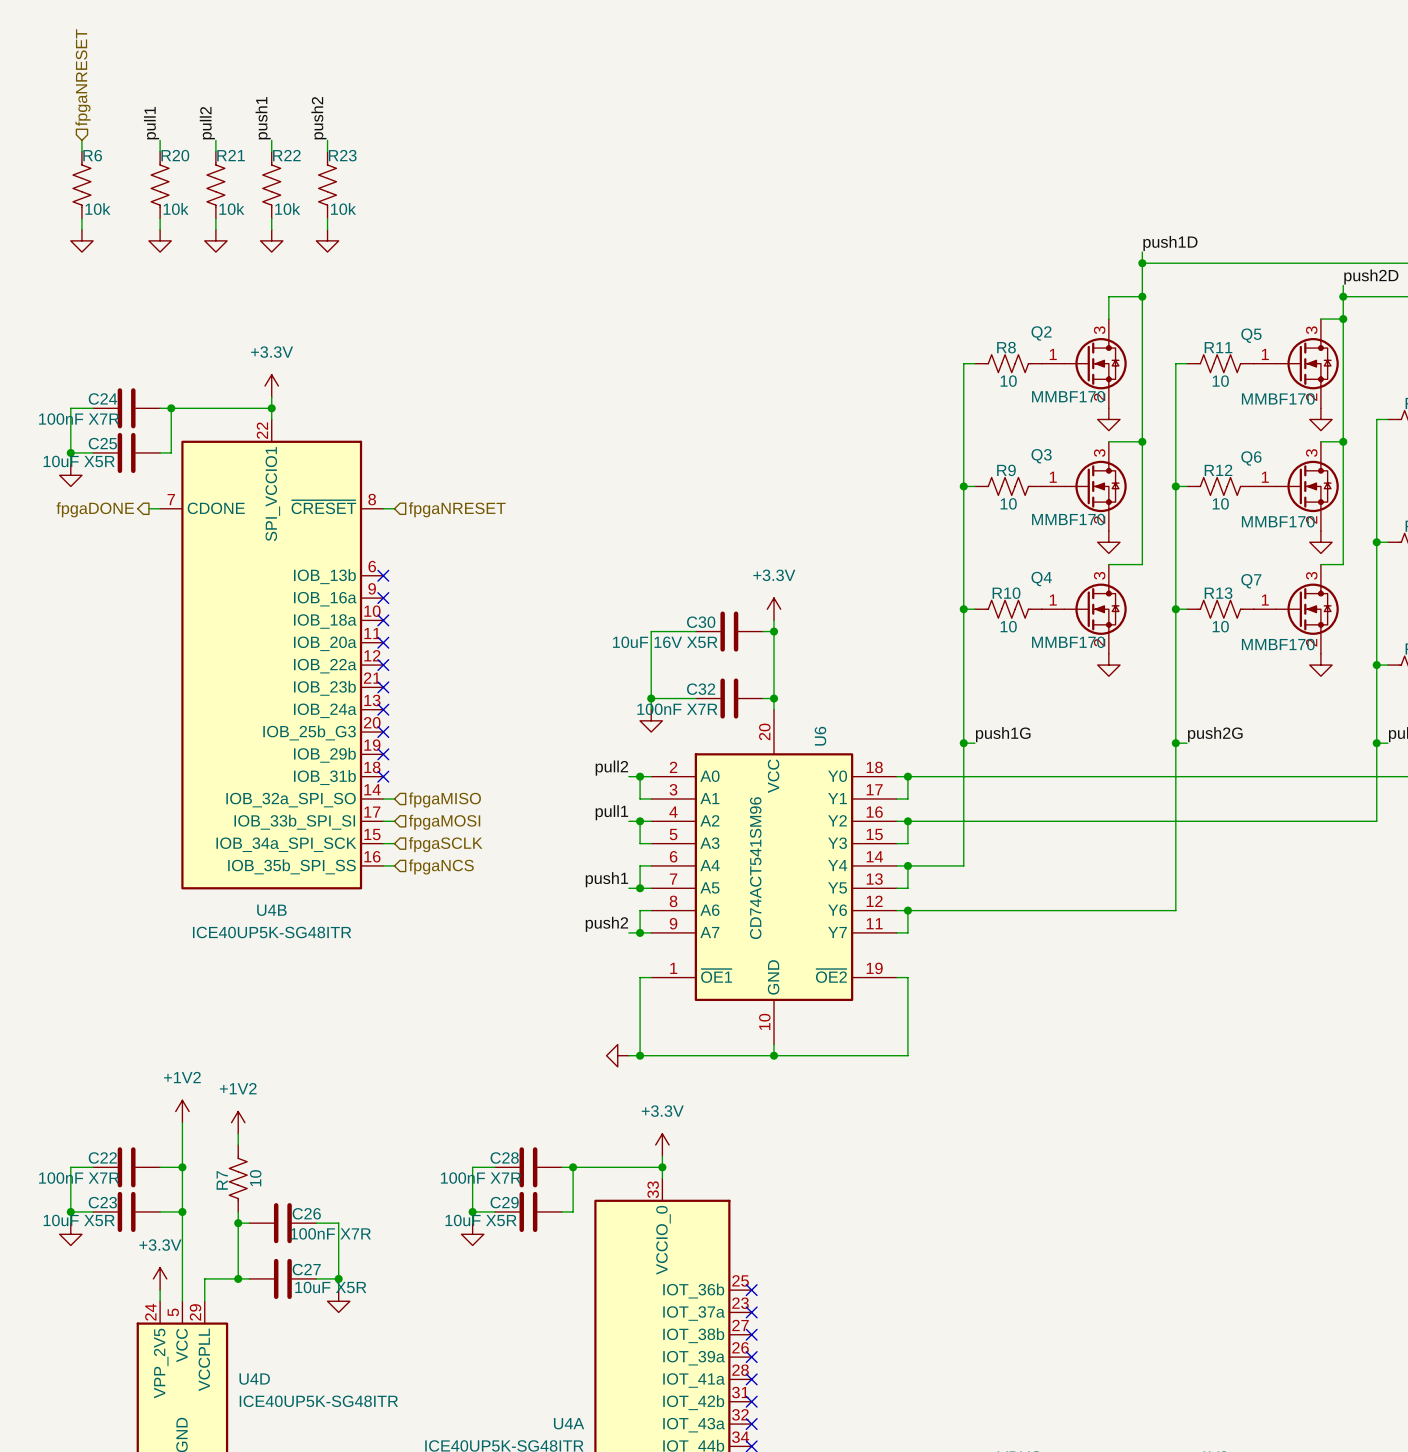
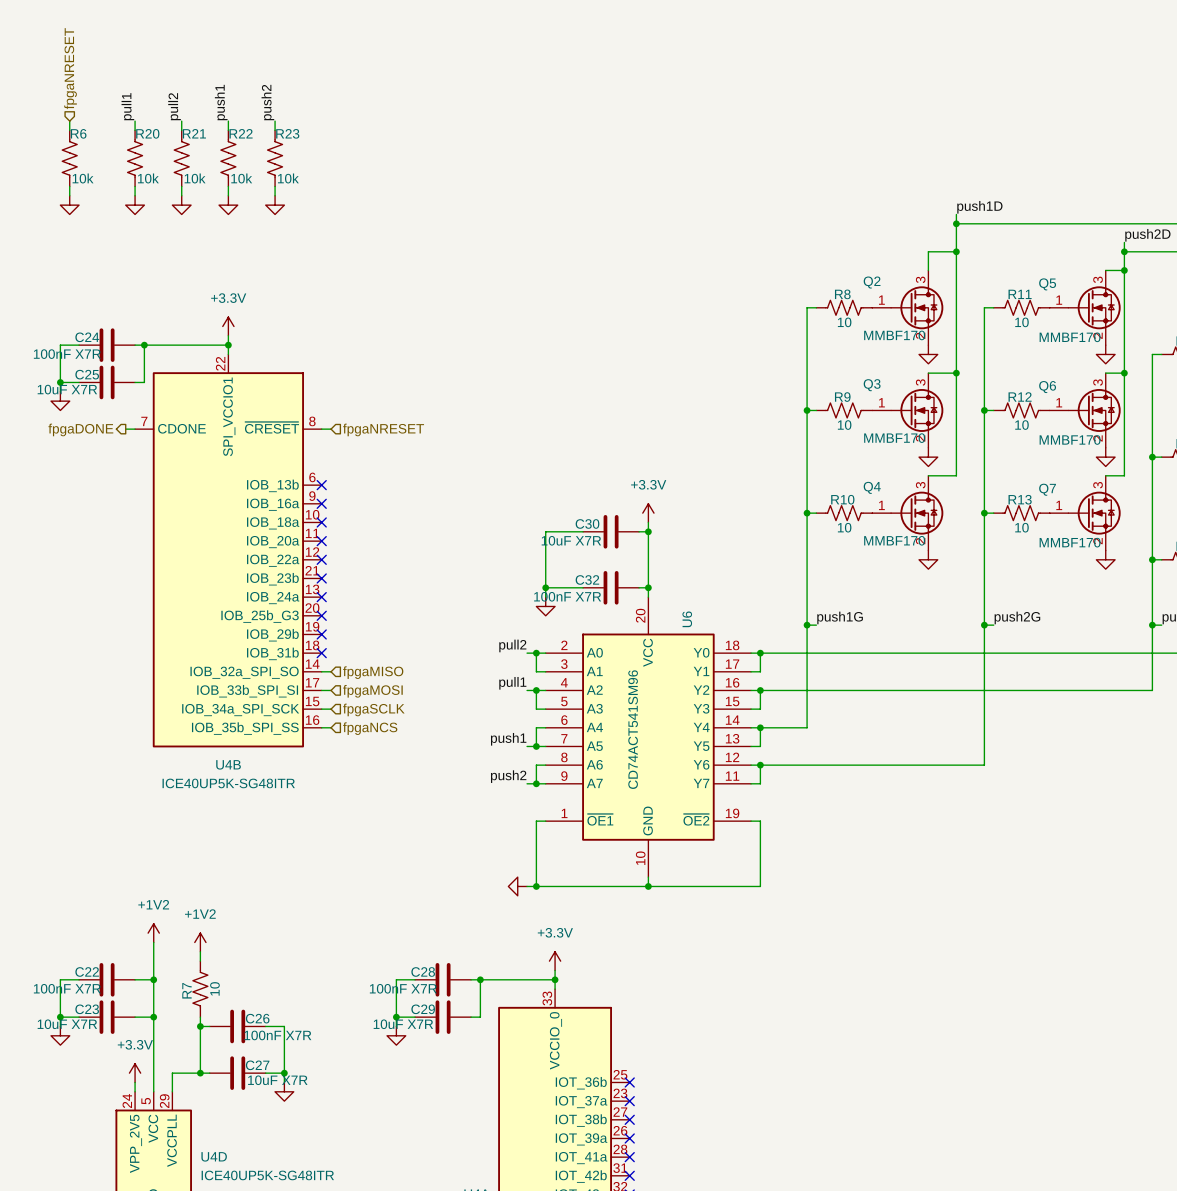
C25 value: 10uF X5R (79, 461) -> 10uF X7R (67, 389)
C30 value: 10uF 16V X5R (665, 642) -> 10uF X7R (571, 540)
C23 value: 10uF X5R (79, 1220) -> 10uF X7R (67, 1024)
C29 value: 10uF X5R (480, 1220) -> 10uF X7R (403, 1024)
C27 value: 10uF X5R (330, 1287) -> 10uF X7R (277, 1080)

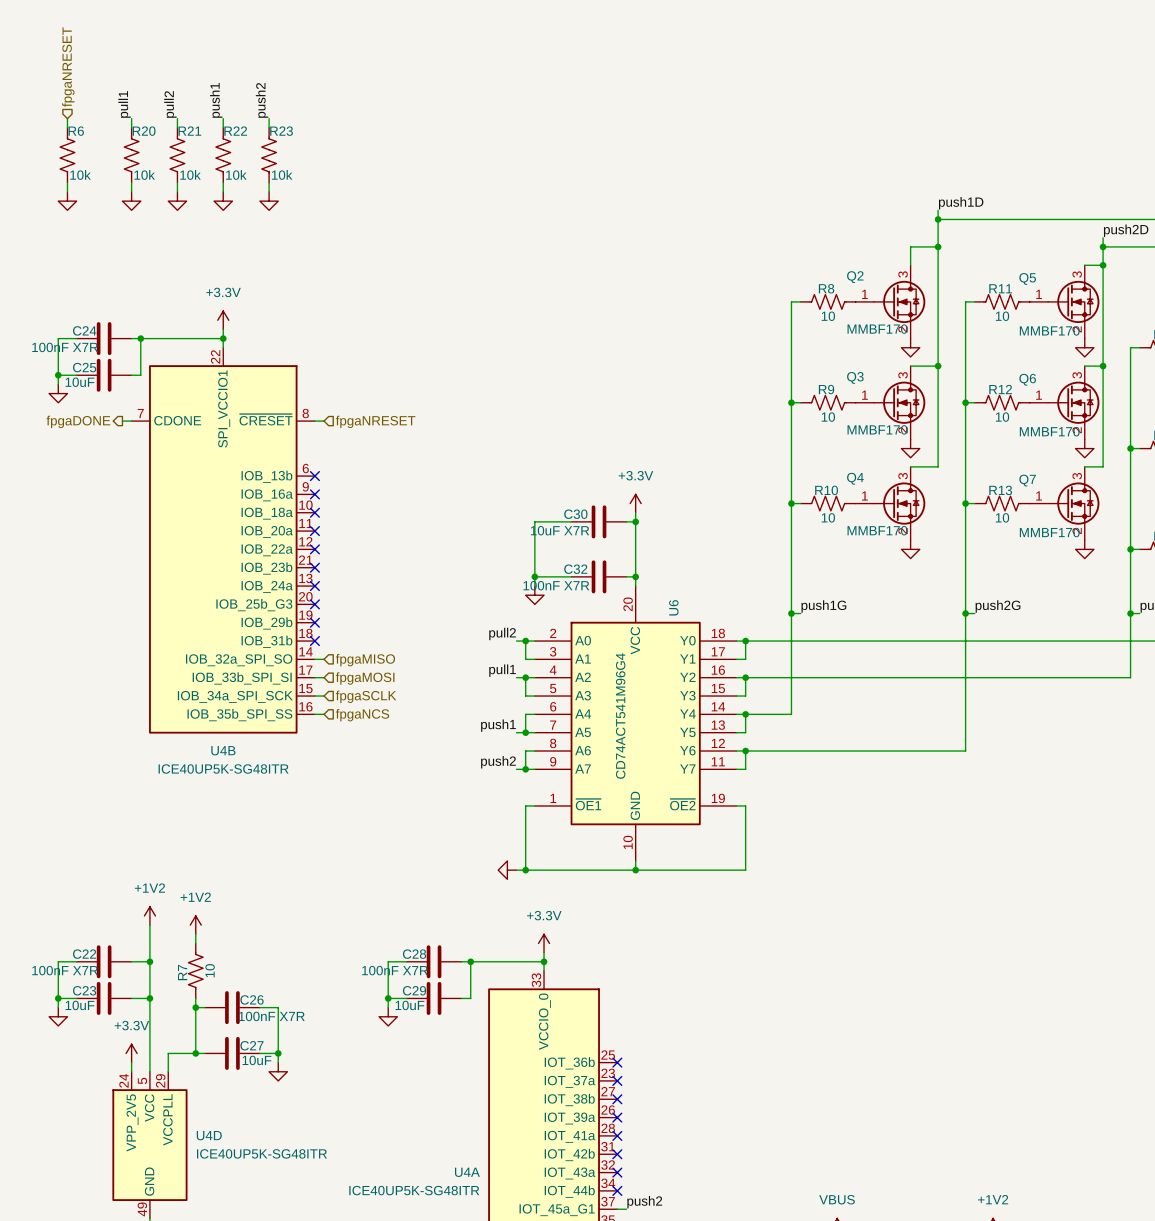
C25 value: 10uF X7R (67, 389) -> 10uF (80, 382)
U6 value: CD74ACT541SM96 (633, 729) -> CD74ACT541M96G4 (620, 716)
C23 value: 10uF X7R (67, 1024) -> 10uF (80, 1005)
C29 value: 10uF X7R (403, 1024) -> 10uF (409, 1005)
C27 value: 10uF X7R (277, 1080) -> 10uF (257, 1060)

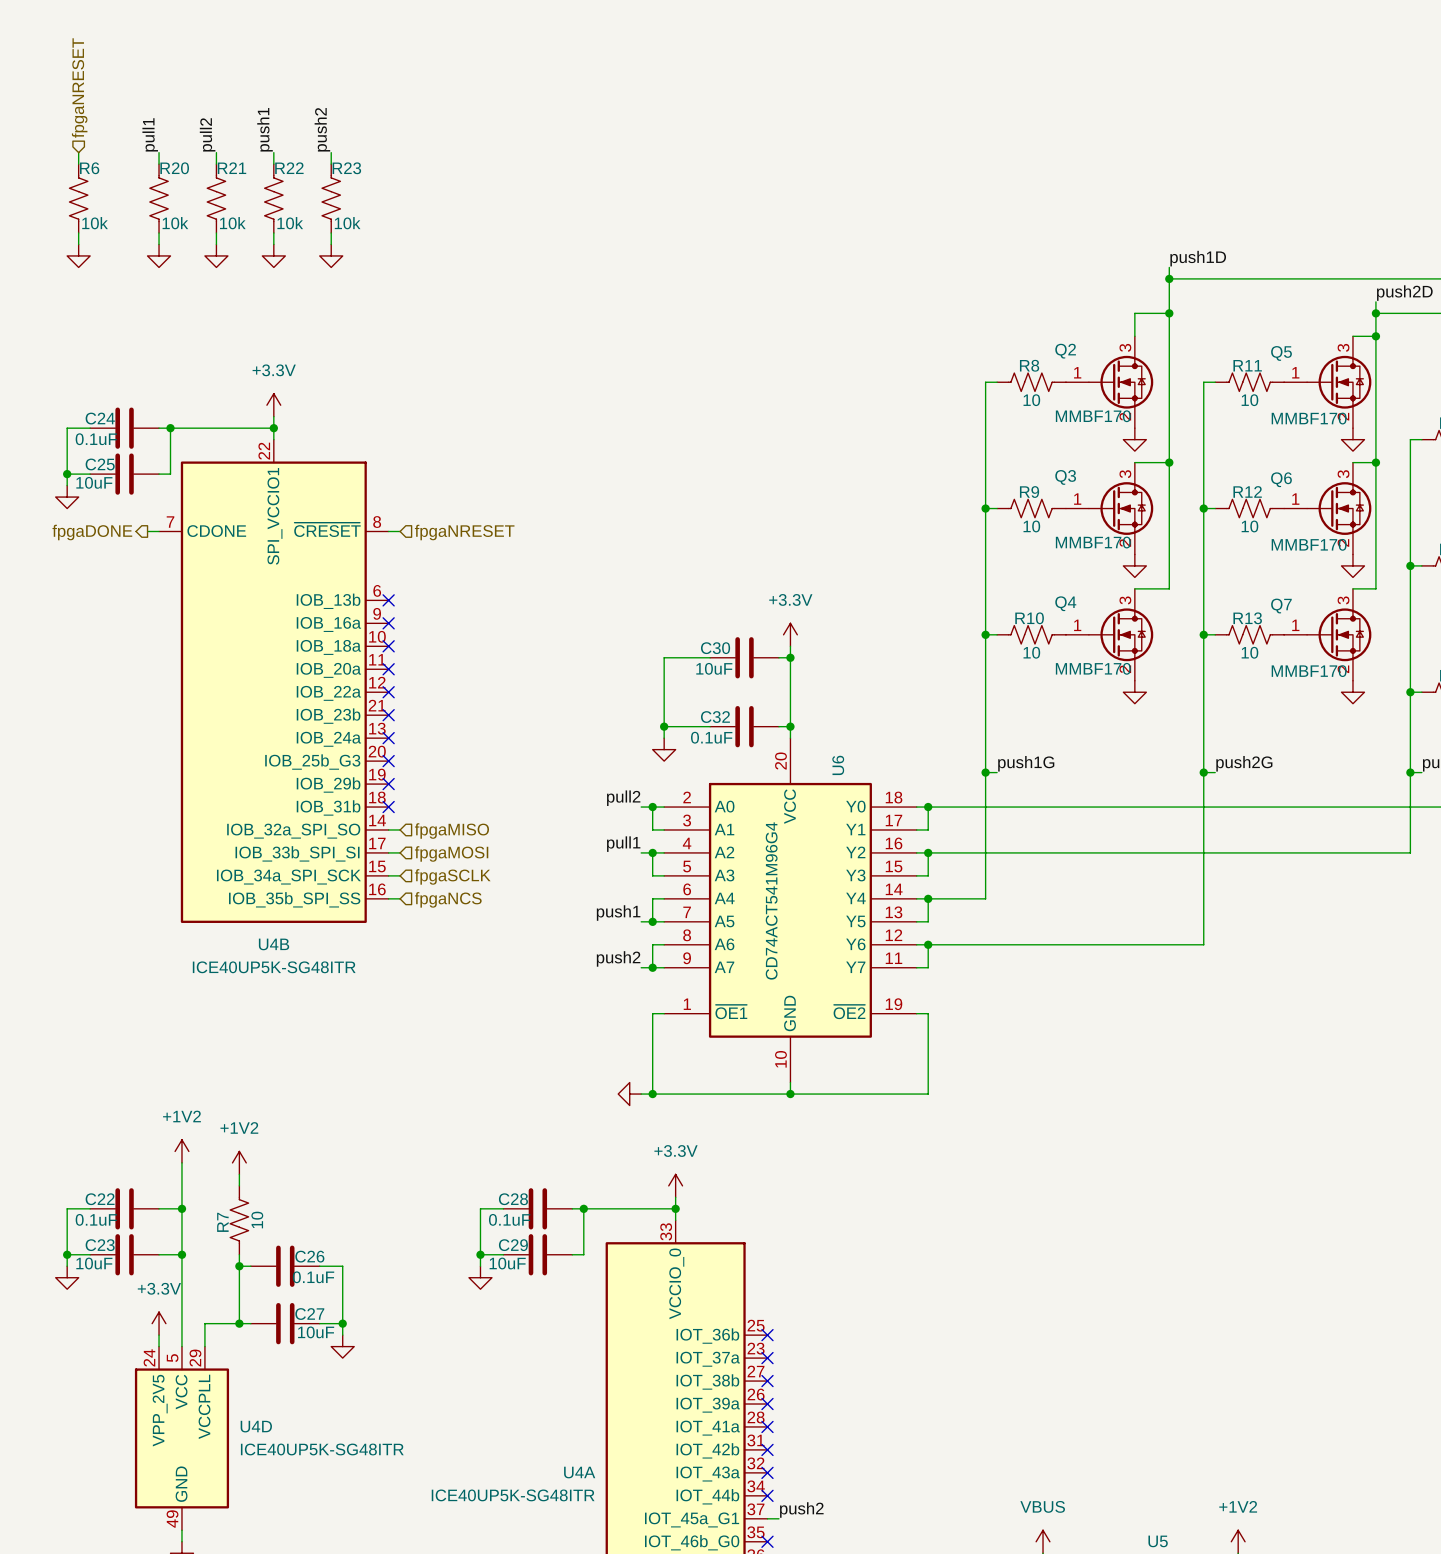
C24 value: 100nF X7R (65, 347) -> 0.1uF (96, 439)
C30 value: 10uF X7R (560, 530) -> 10uF (714, 668)
C32 value: 100nF X7R (556, 585) -> 0.1uF (711, 737)
C22 value: 100nF X7R (65, 970) -> 0.1uF (96, 1219)
C28 value: 100nF X7R (395, 970) -> 0.1uF (509, 1219)
C26 value: 100nF X7R (271, 1016) -> 0.1uF (313, 1277)

